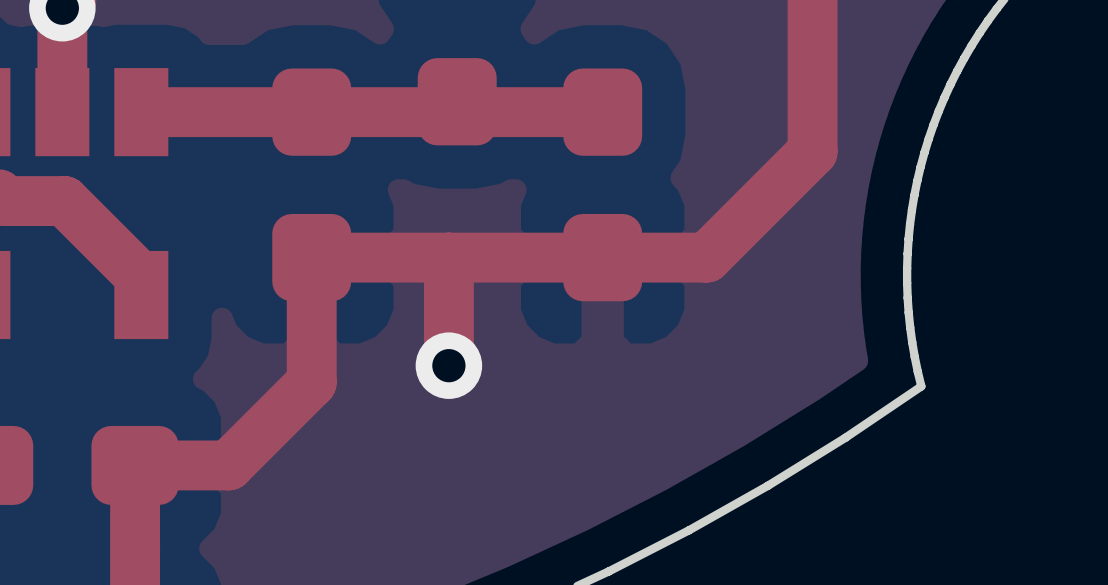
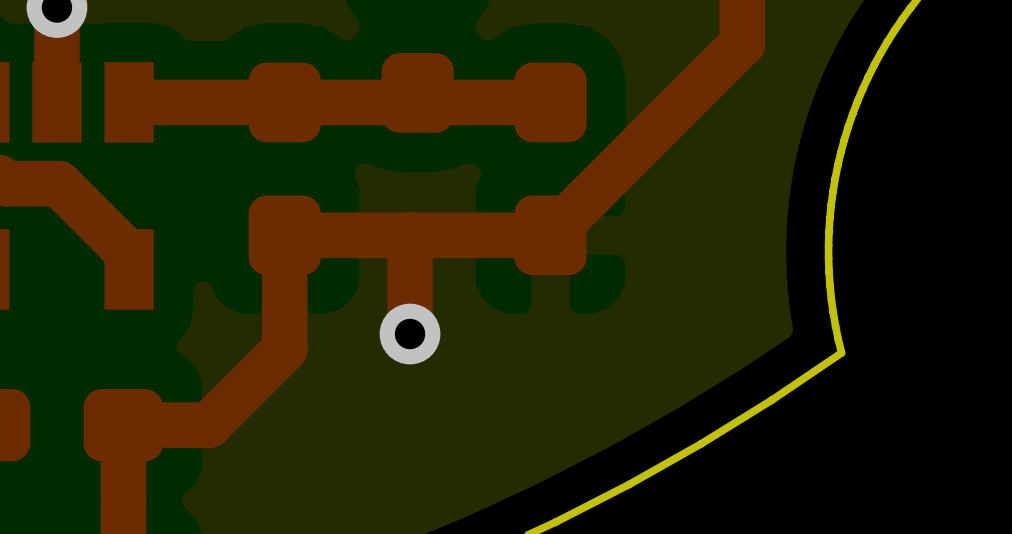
top track: (812, 47) (812, 151) (706, 257) (602, 257) -> (742, 43) (550, 235)

